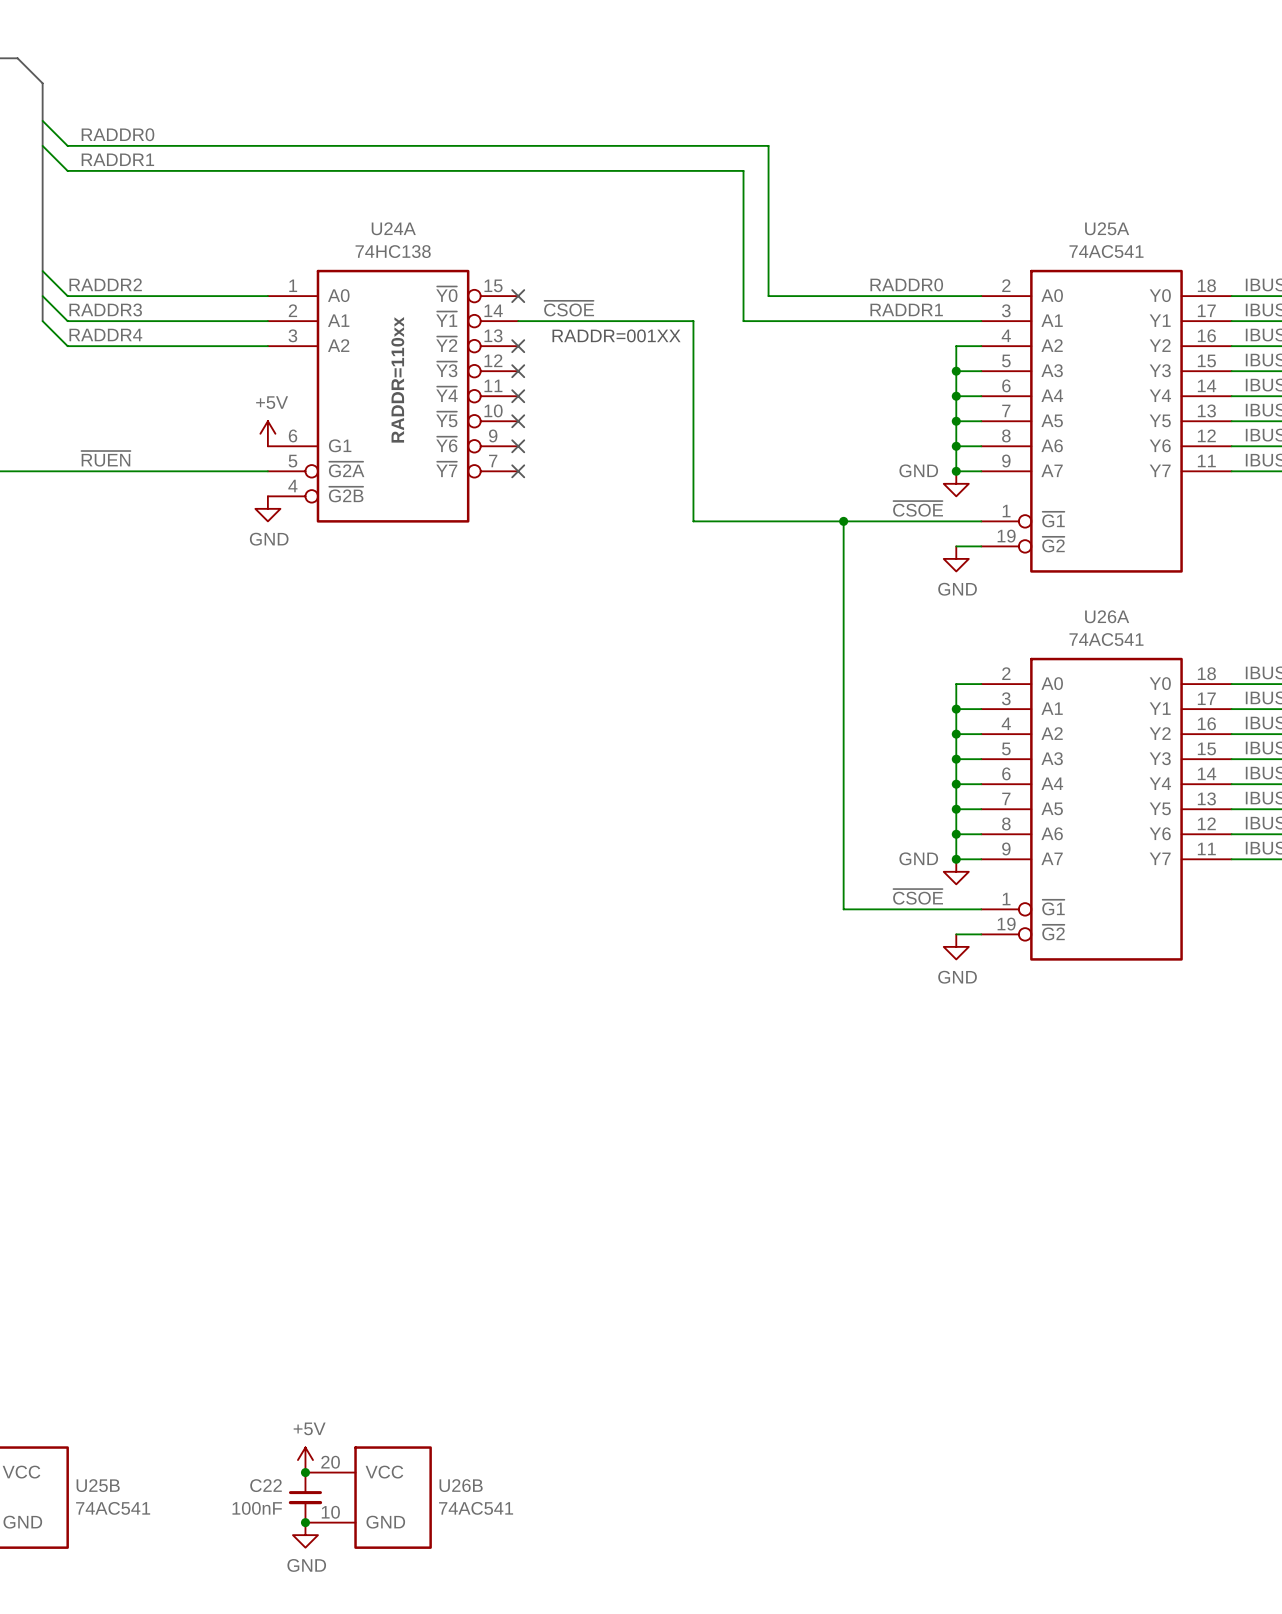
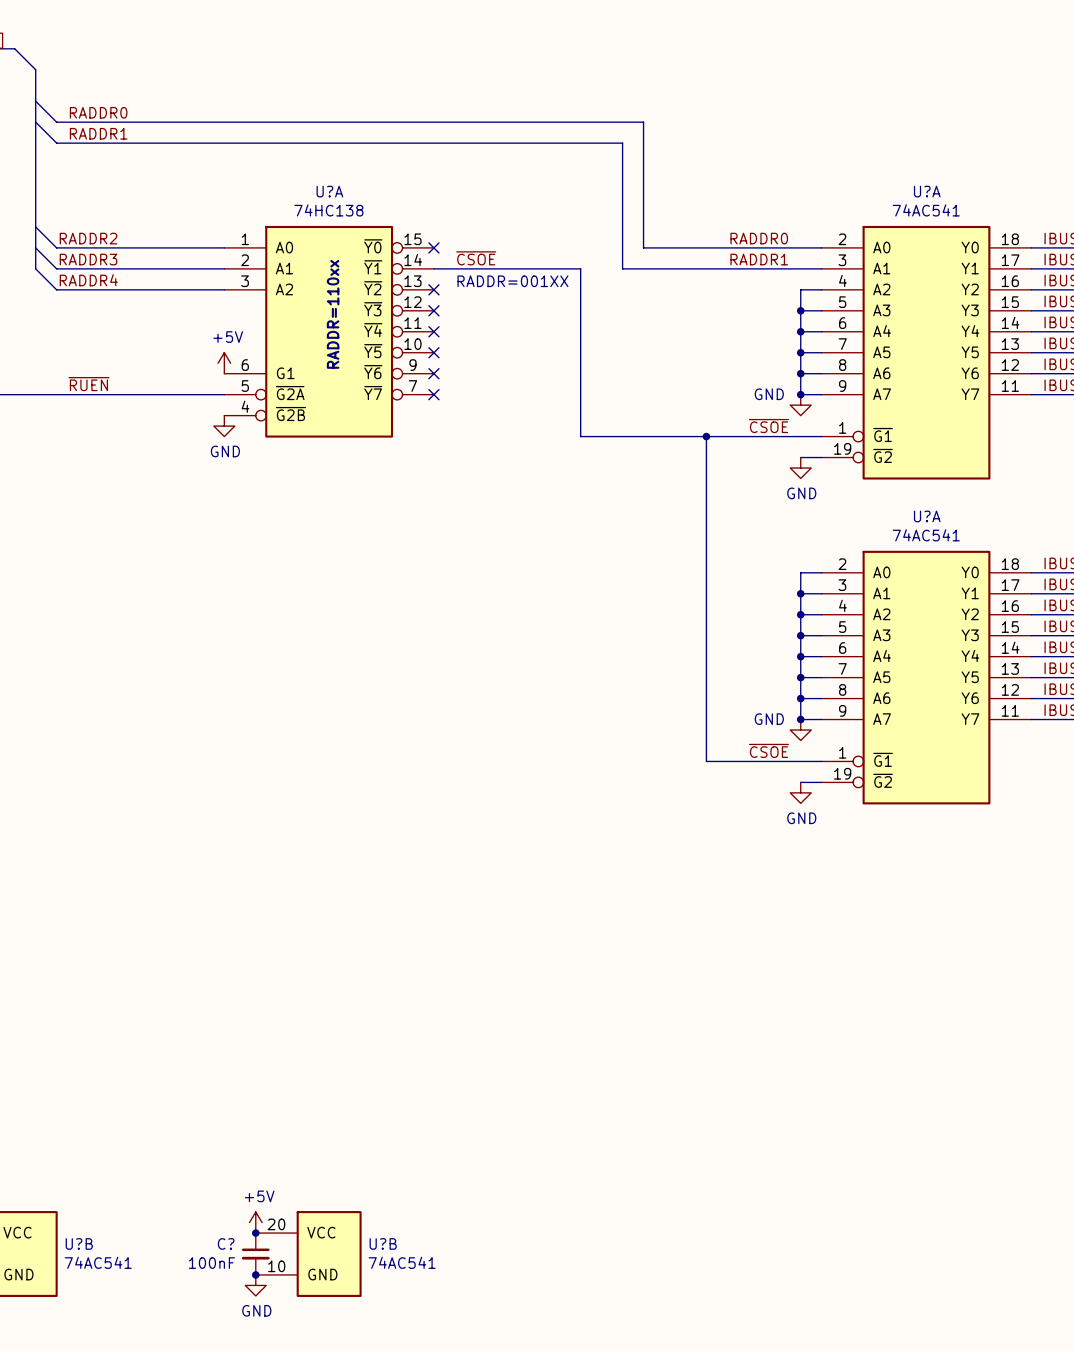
U24A name: U24A (393, 228) -> U?A (329, 191)
U25A name: U25A (1107, 228) -> U?A (927, 191)
U26A name: U26A (1107, 616) -> U?A (927, 516)
U25B name: U25B (98, 1485) -> U?B (79, 1243)
C22 name: C22 (266, 1485) -> C? (226, 1243)
U26B name: U26B (461, 1485) -> U?B (383, 1243)

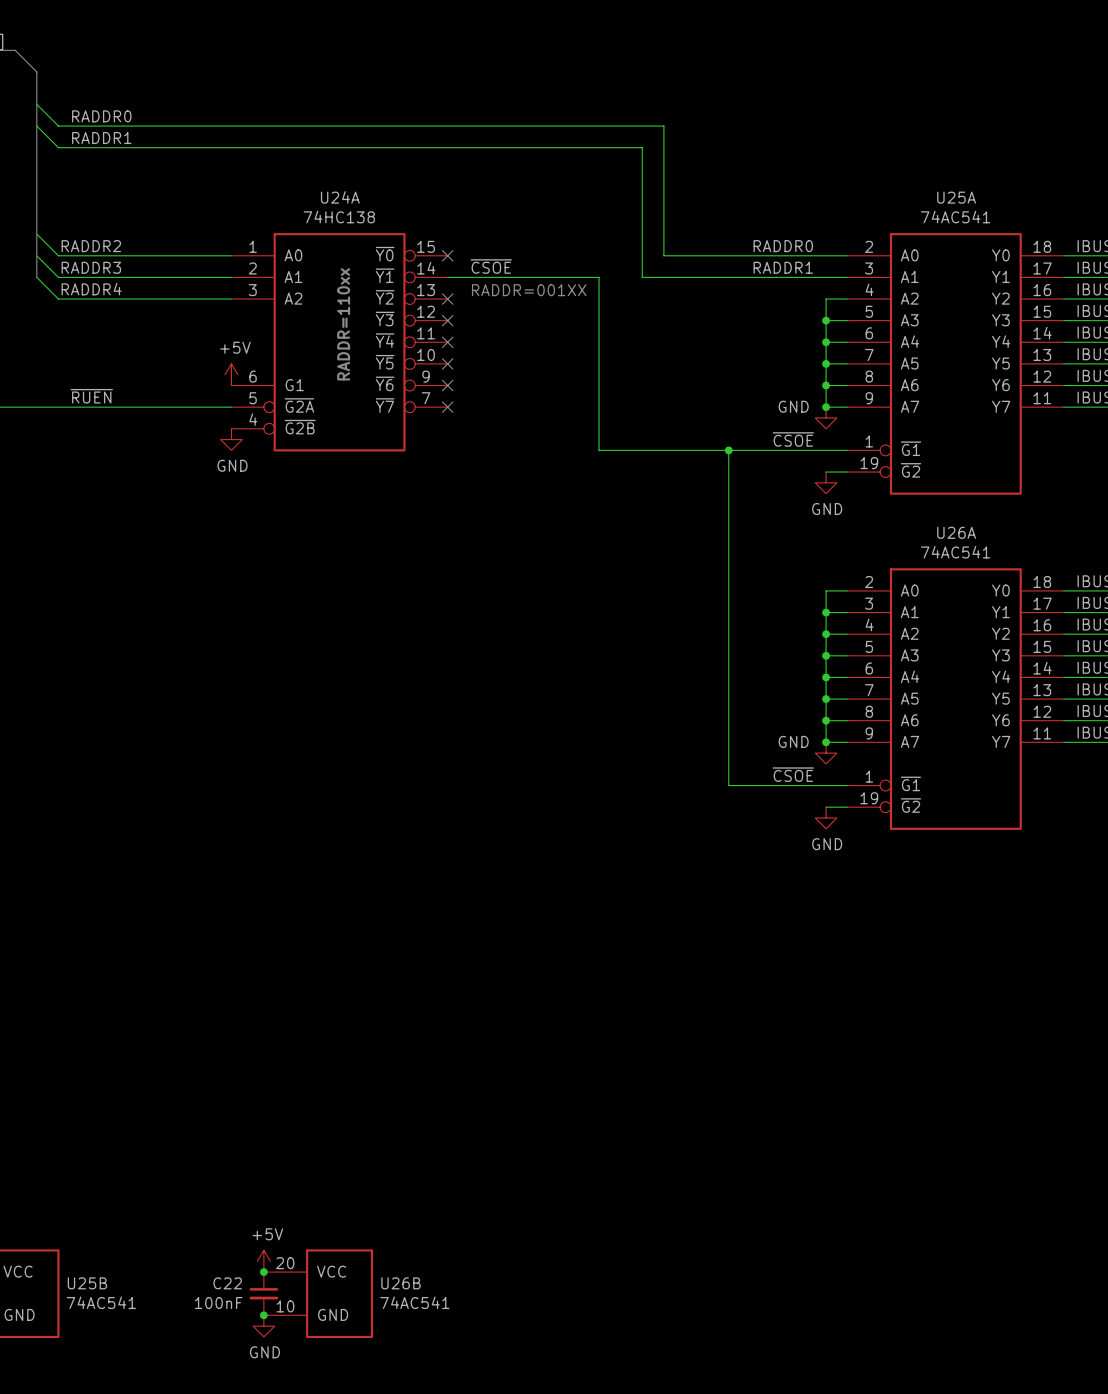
U?A name: U?A (329, 191) -> U24A (340, 197)
U?A name: U?A (927, 191) -> U25A (956, 197)
U?A name: U?A (927, 516) -> U26A (956, 532)
U?B name: U?B (79, 1243) -> U25B (87, 1283)
C? name: C? (226, 1243) -> C22 (227, 1283)
U?B name: U?B (383, 1243) -> U26B (400, 1283)

